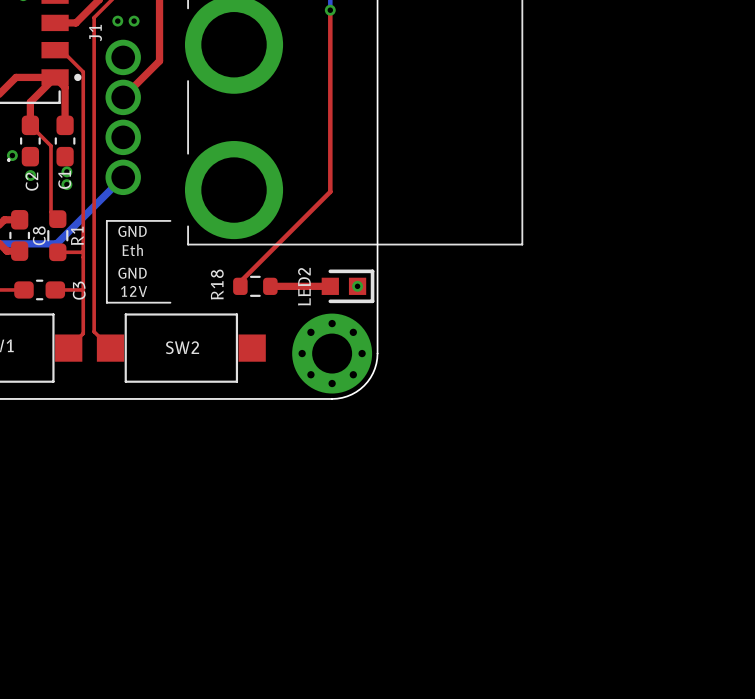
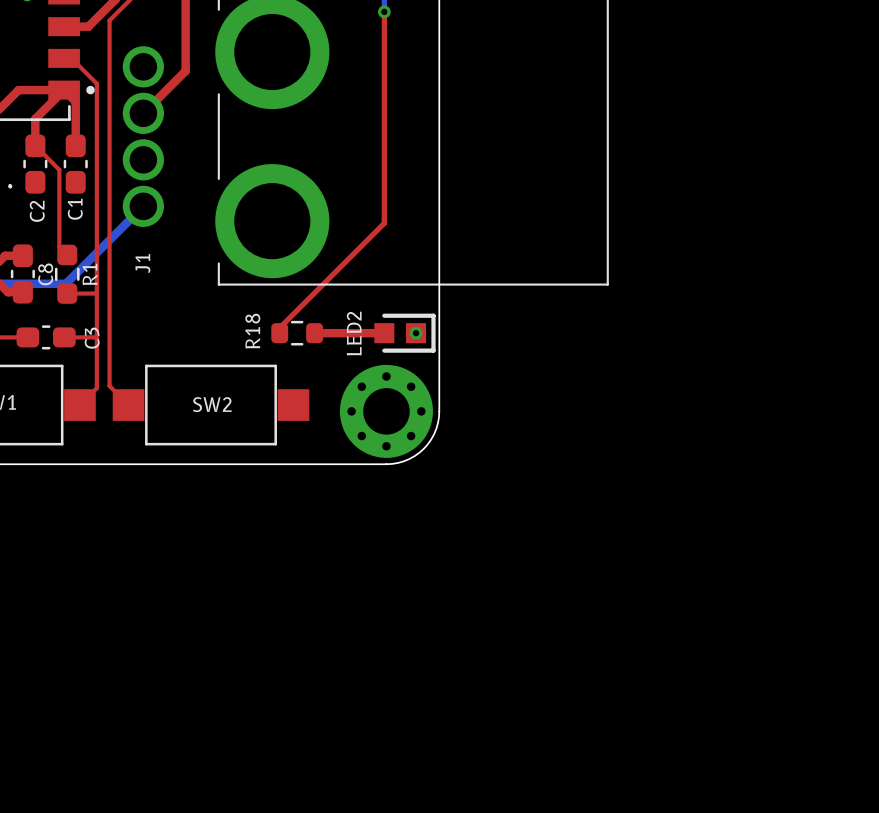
via: (117, 21) -> none
via: (134, 21) -> none
J1 name position: J1 (95, 33) -> J1 (142, 263)
via: (12, 155) -> none
via: (66, 171) -> none
via: (30, 175) -> none
via: (66, 184) -> none
drawing: [105, 220, 172, 304] -> none

